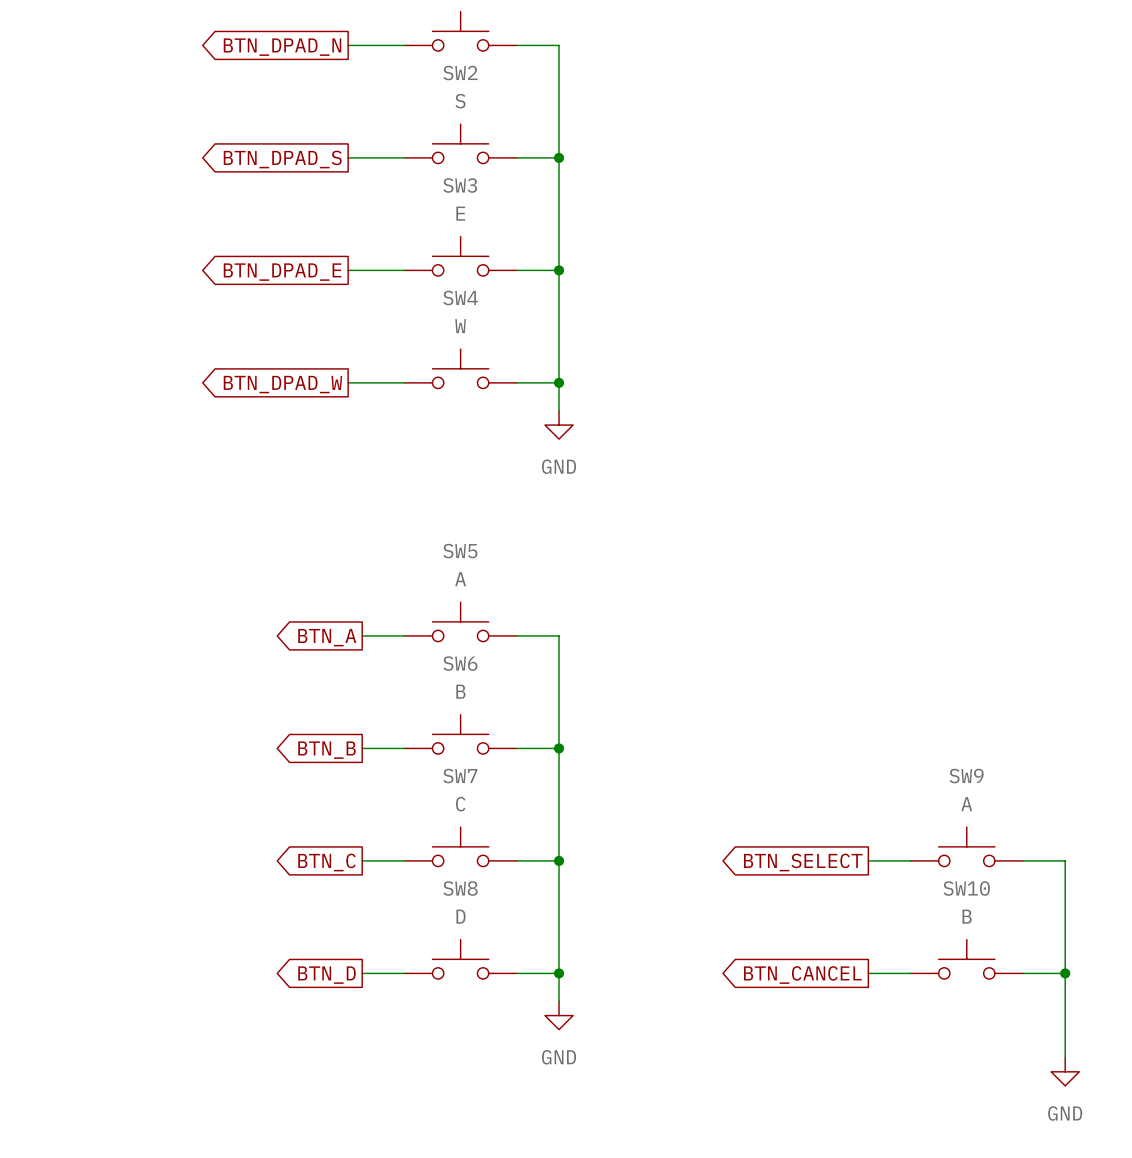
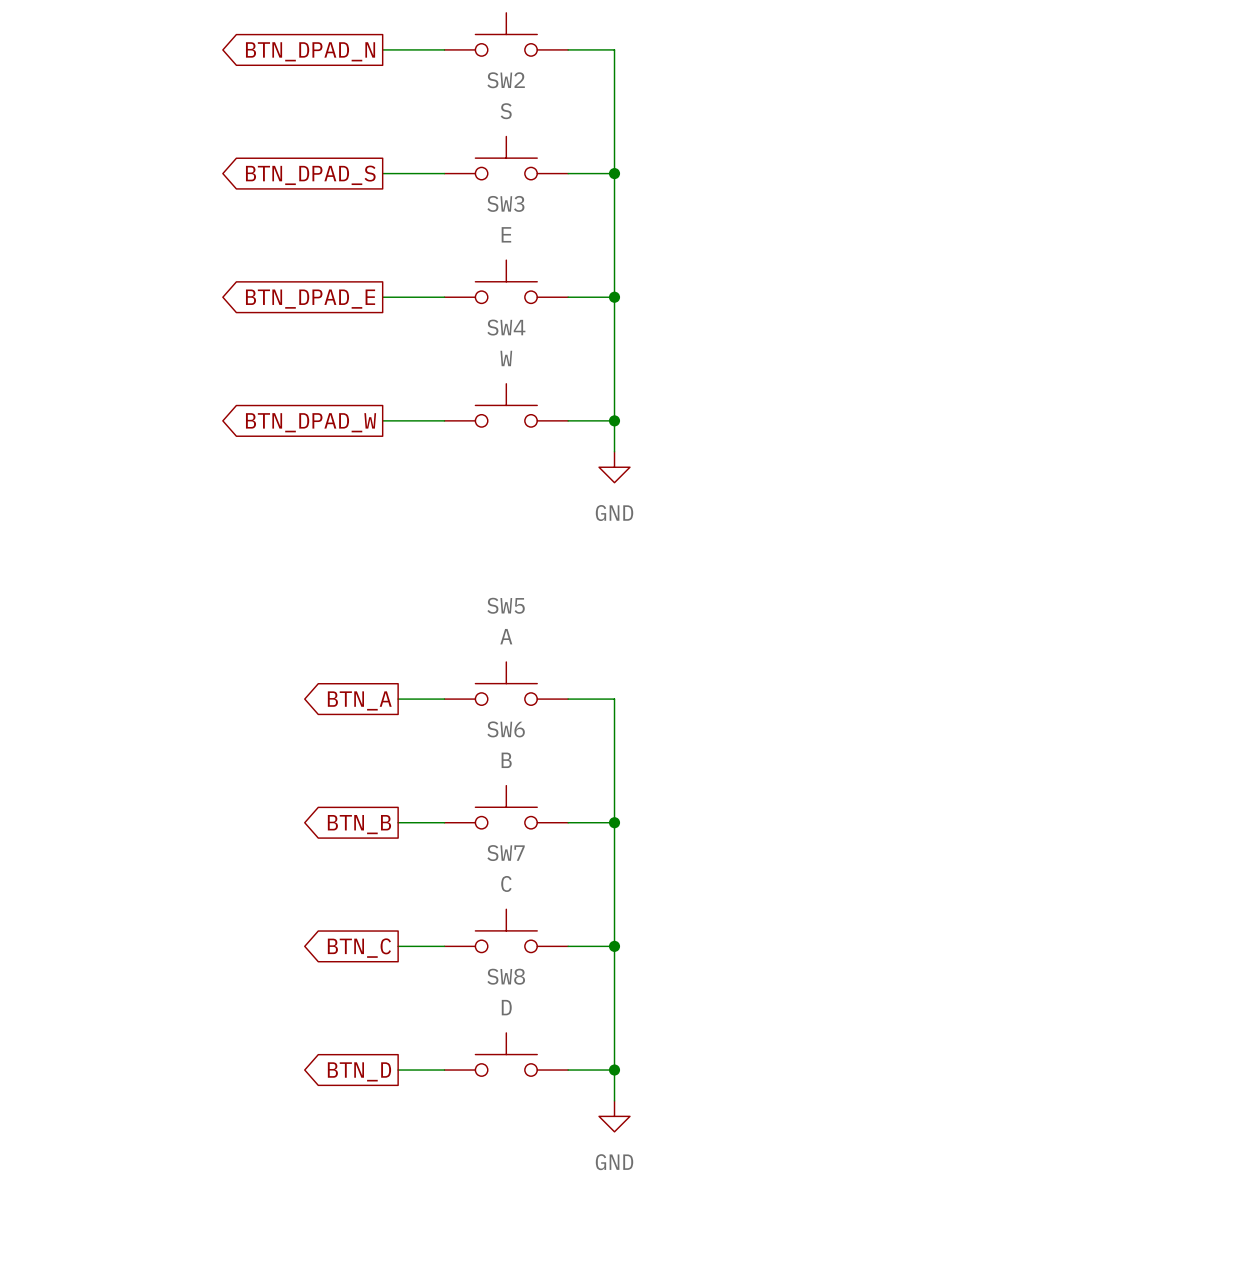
SW9: A (966, 846) -> none
wire: (868, 860) (910, 860) -> none
wire: (1023, 860) (1065, 860) (1065, 1057) -> none
global label: BTN_SELECT (803, 862) -> none
SW10: B (966, 959) -> none
wire: (868, 973) (910, 973) -> none
wire: (1023, 973) (1065, 973) -> none
junction: (1065, 973) -> none
global label: BTN_CANCEL (802, 974) -> none
power symbol: GND (1065, 1071) -> none

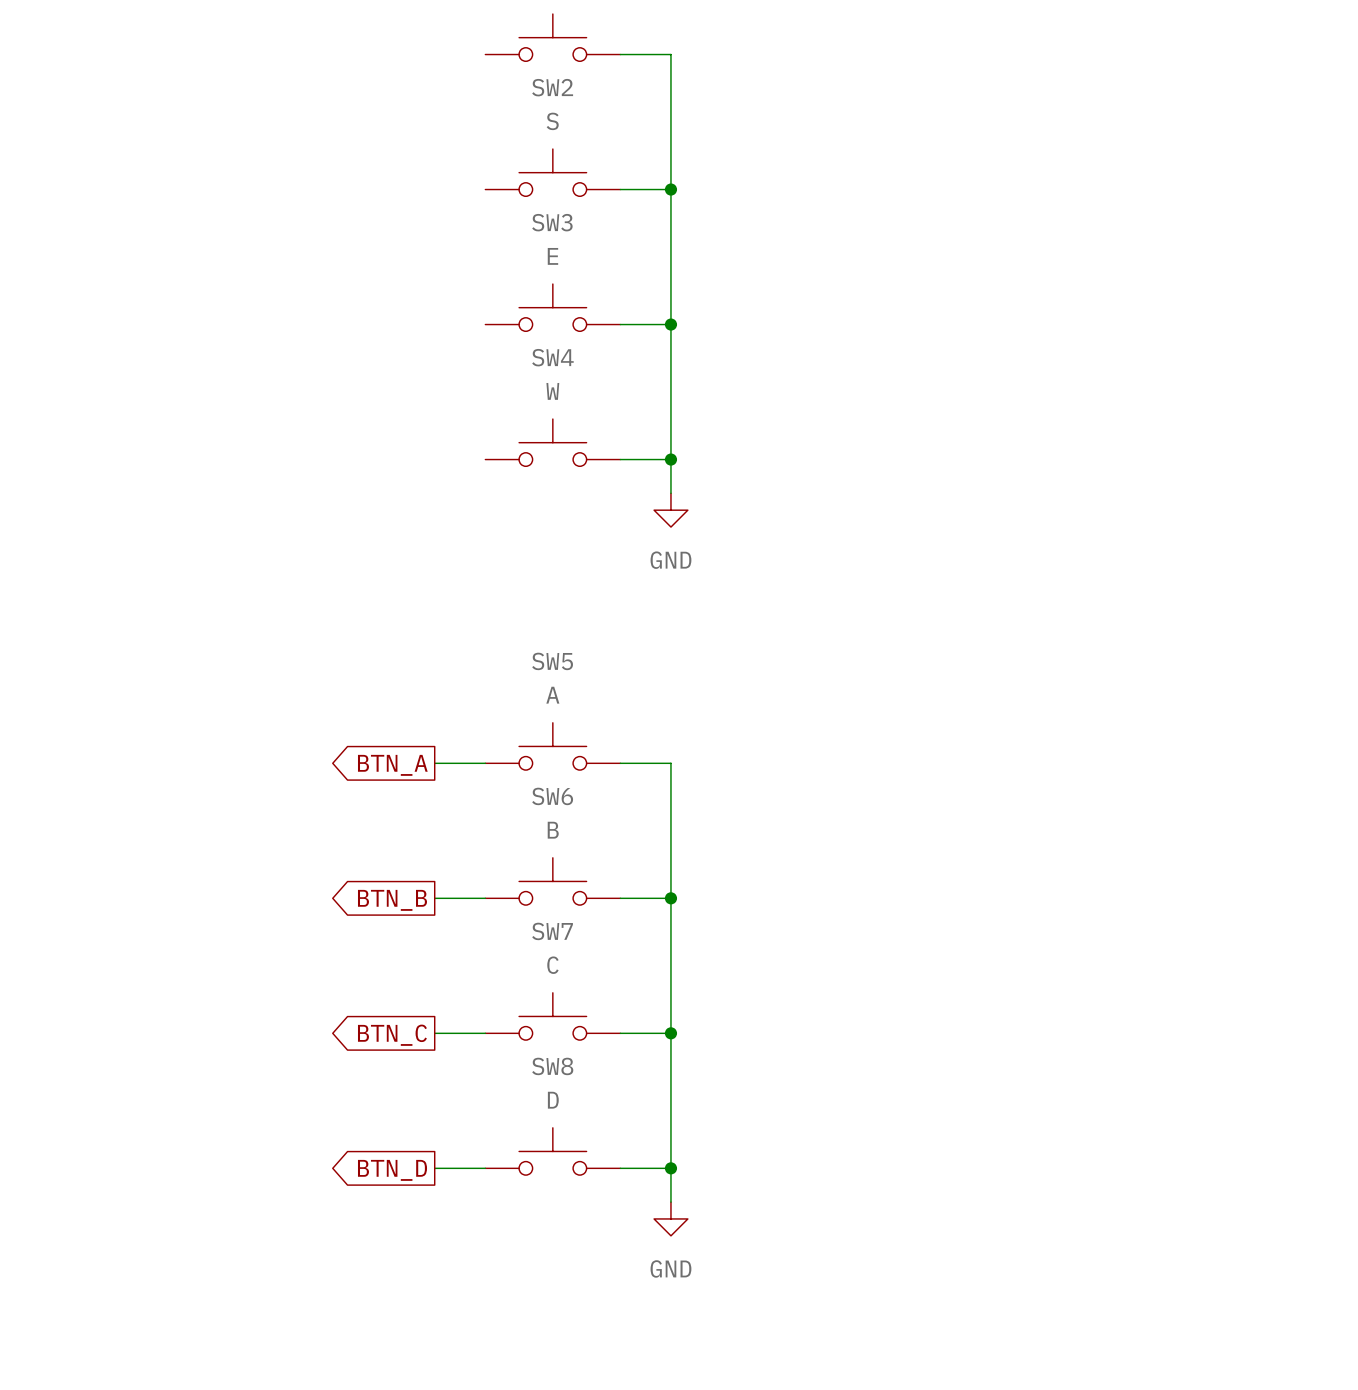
wire: (382, 49) (444, 49) -> none
global label: BTN_DPAD_N (310, 51) -> none
wire: (382, 173) (444, 173) -> none
global label: BTN_DPAD_S (310, 175) -> none
wire: (382, 297) (444, 297) -> none
global label: BTN_DPAD_E (310, 299) -> none
wire: (382, 420) (444, 420) -> none
global label: BTN_DPAD_W (311, 422) -> none

